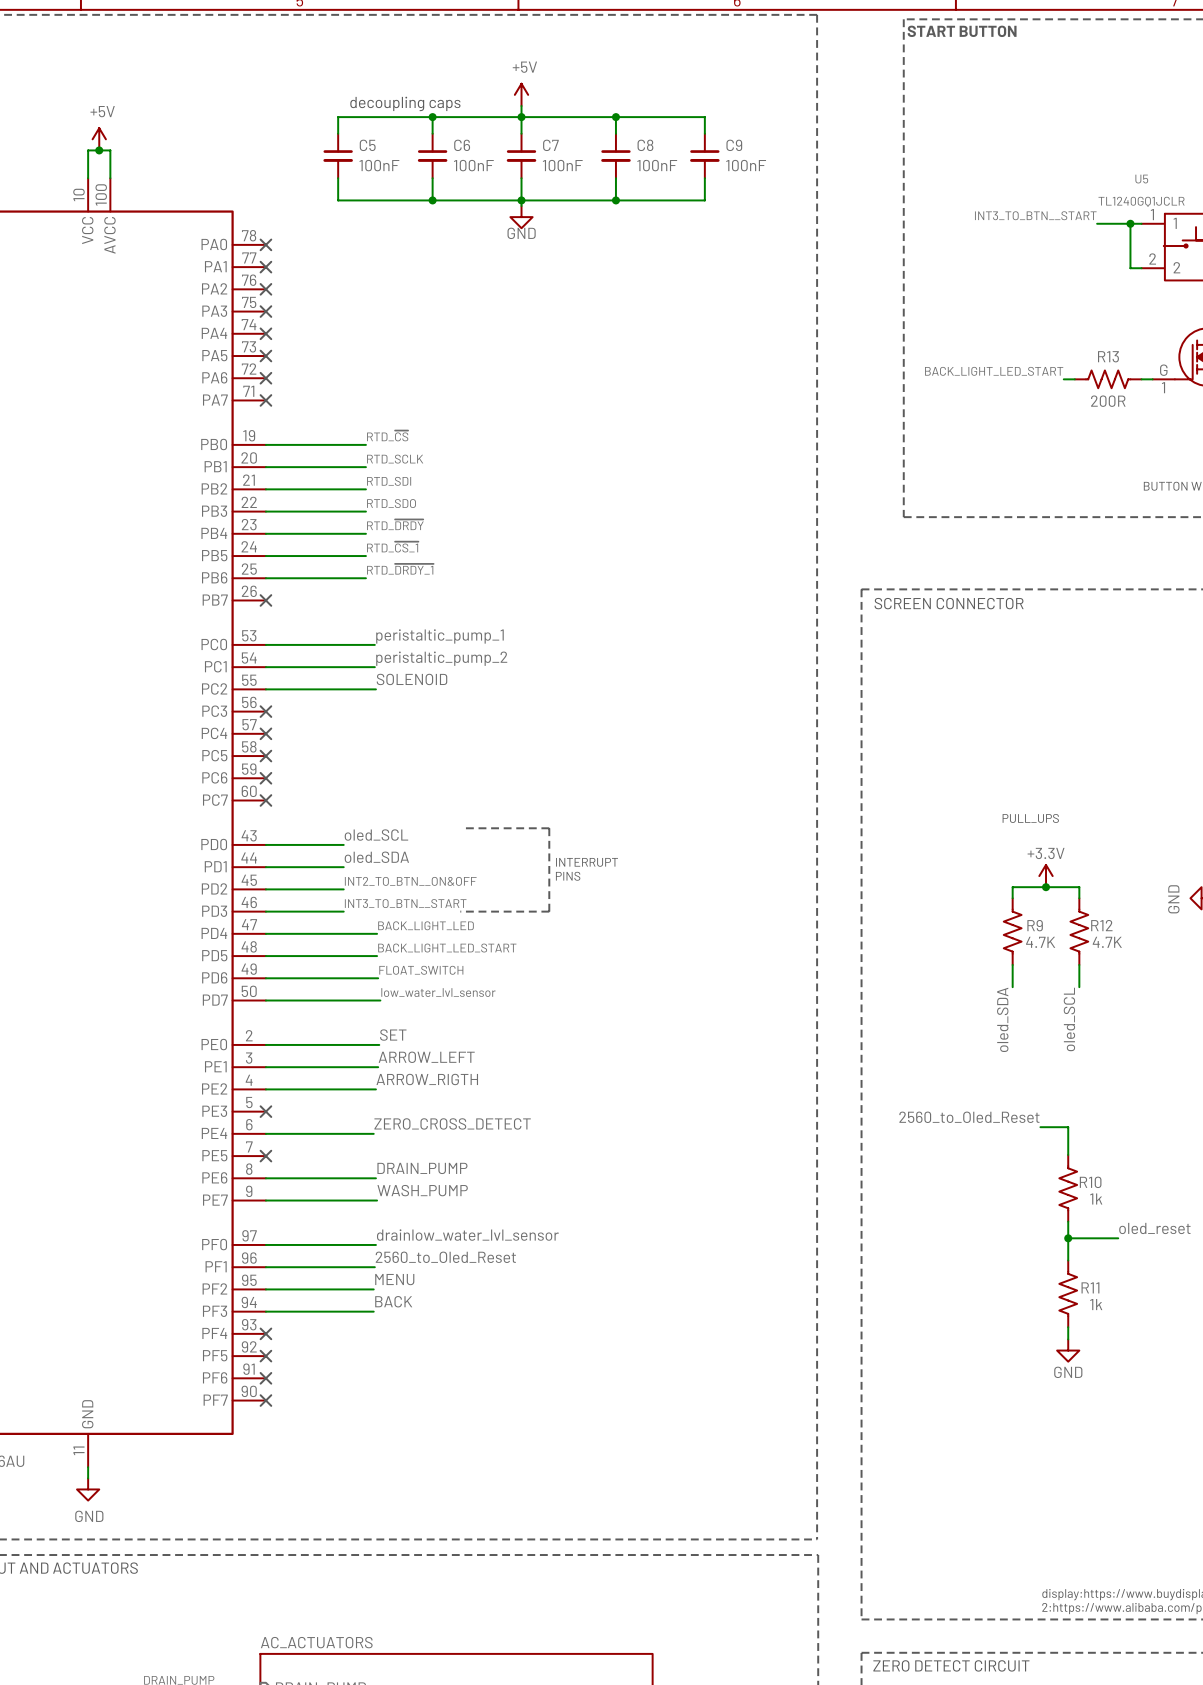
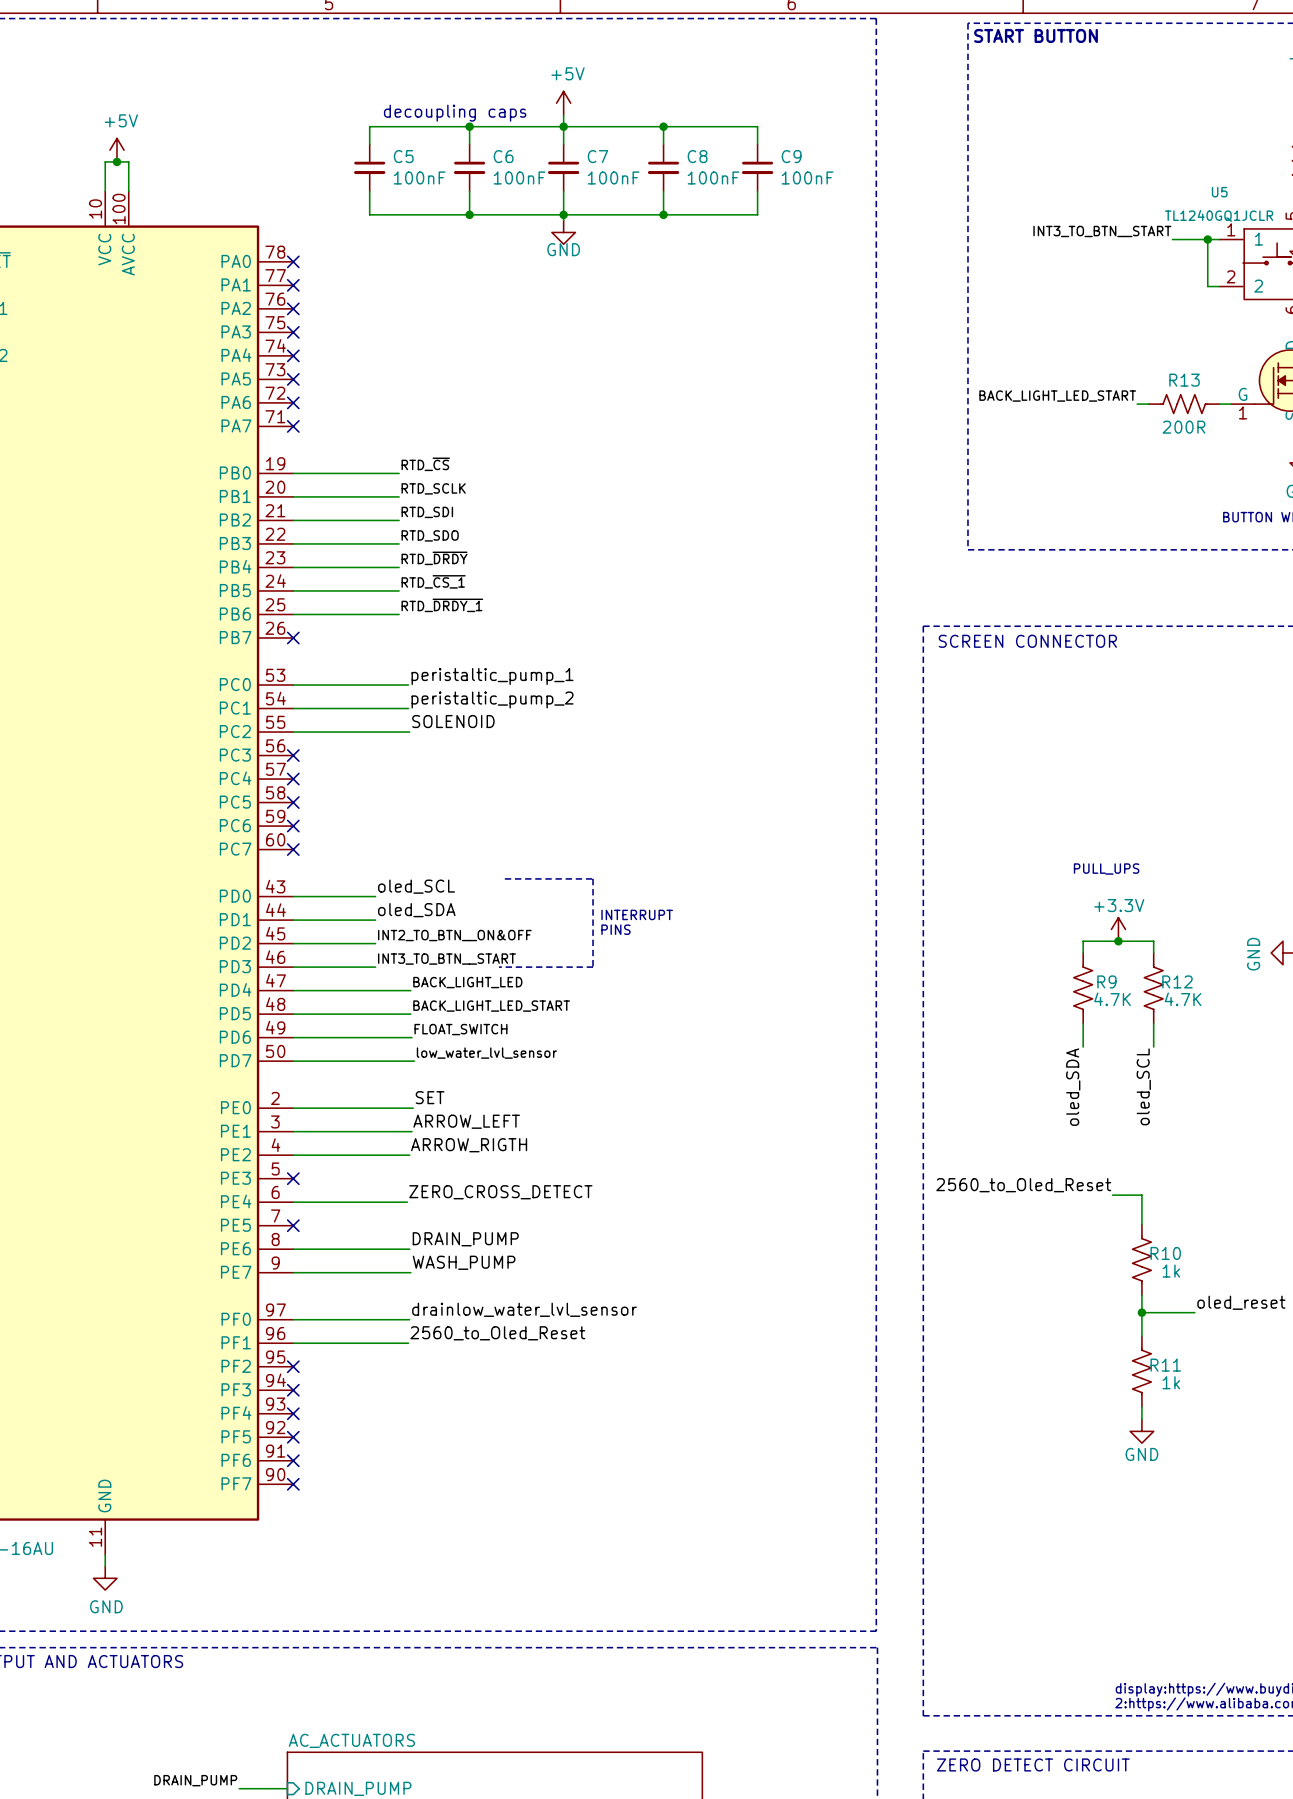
label: MENU (394, 1279) -> none
wire: (265, 1289) (373, 1289) -> none
no-connect mark: none -> (293, 1366)
label: BACK (393, 1301) -> none
wire: (265, 1311) (373, 1311) -> none
no-connect mark: none -> (293, 1390)

